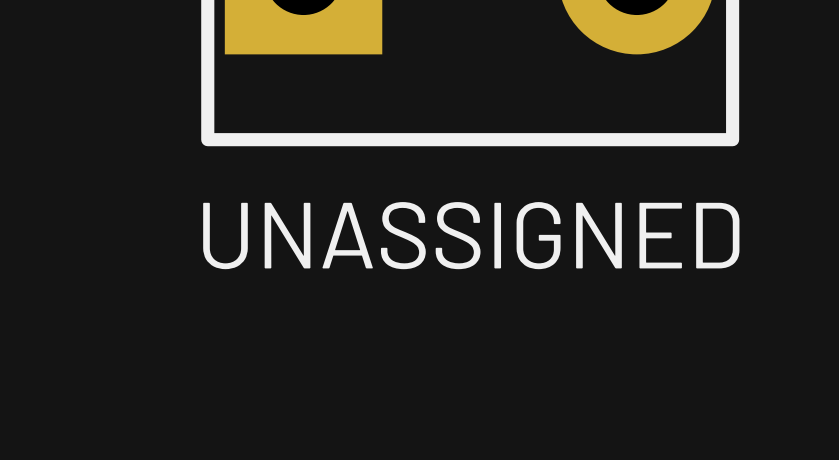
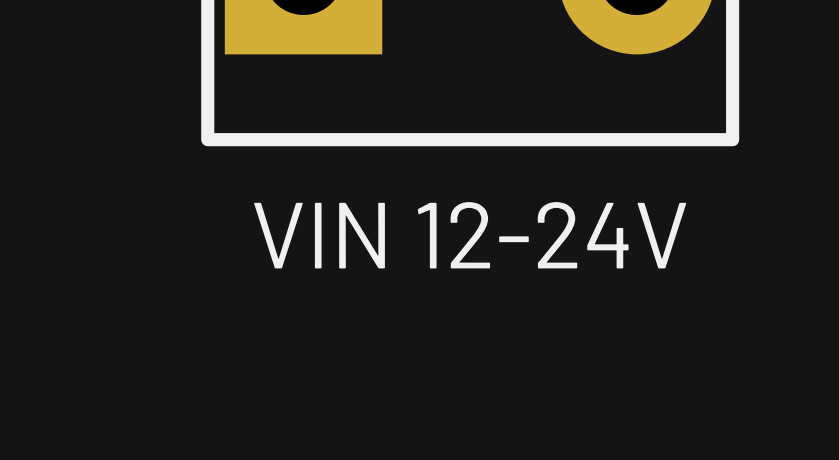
part value: UNASSIGNED (471, 235) -> VIN 12-24V (470, 235)

